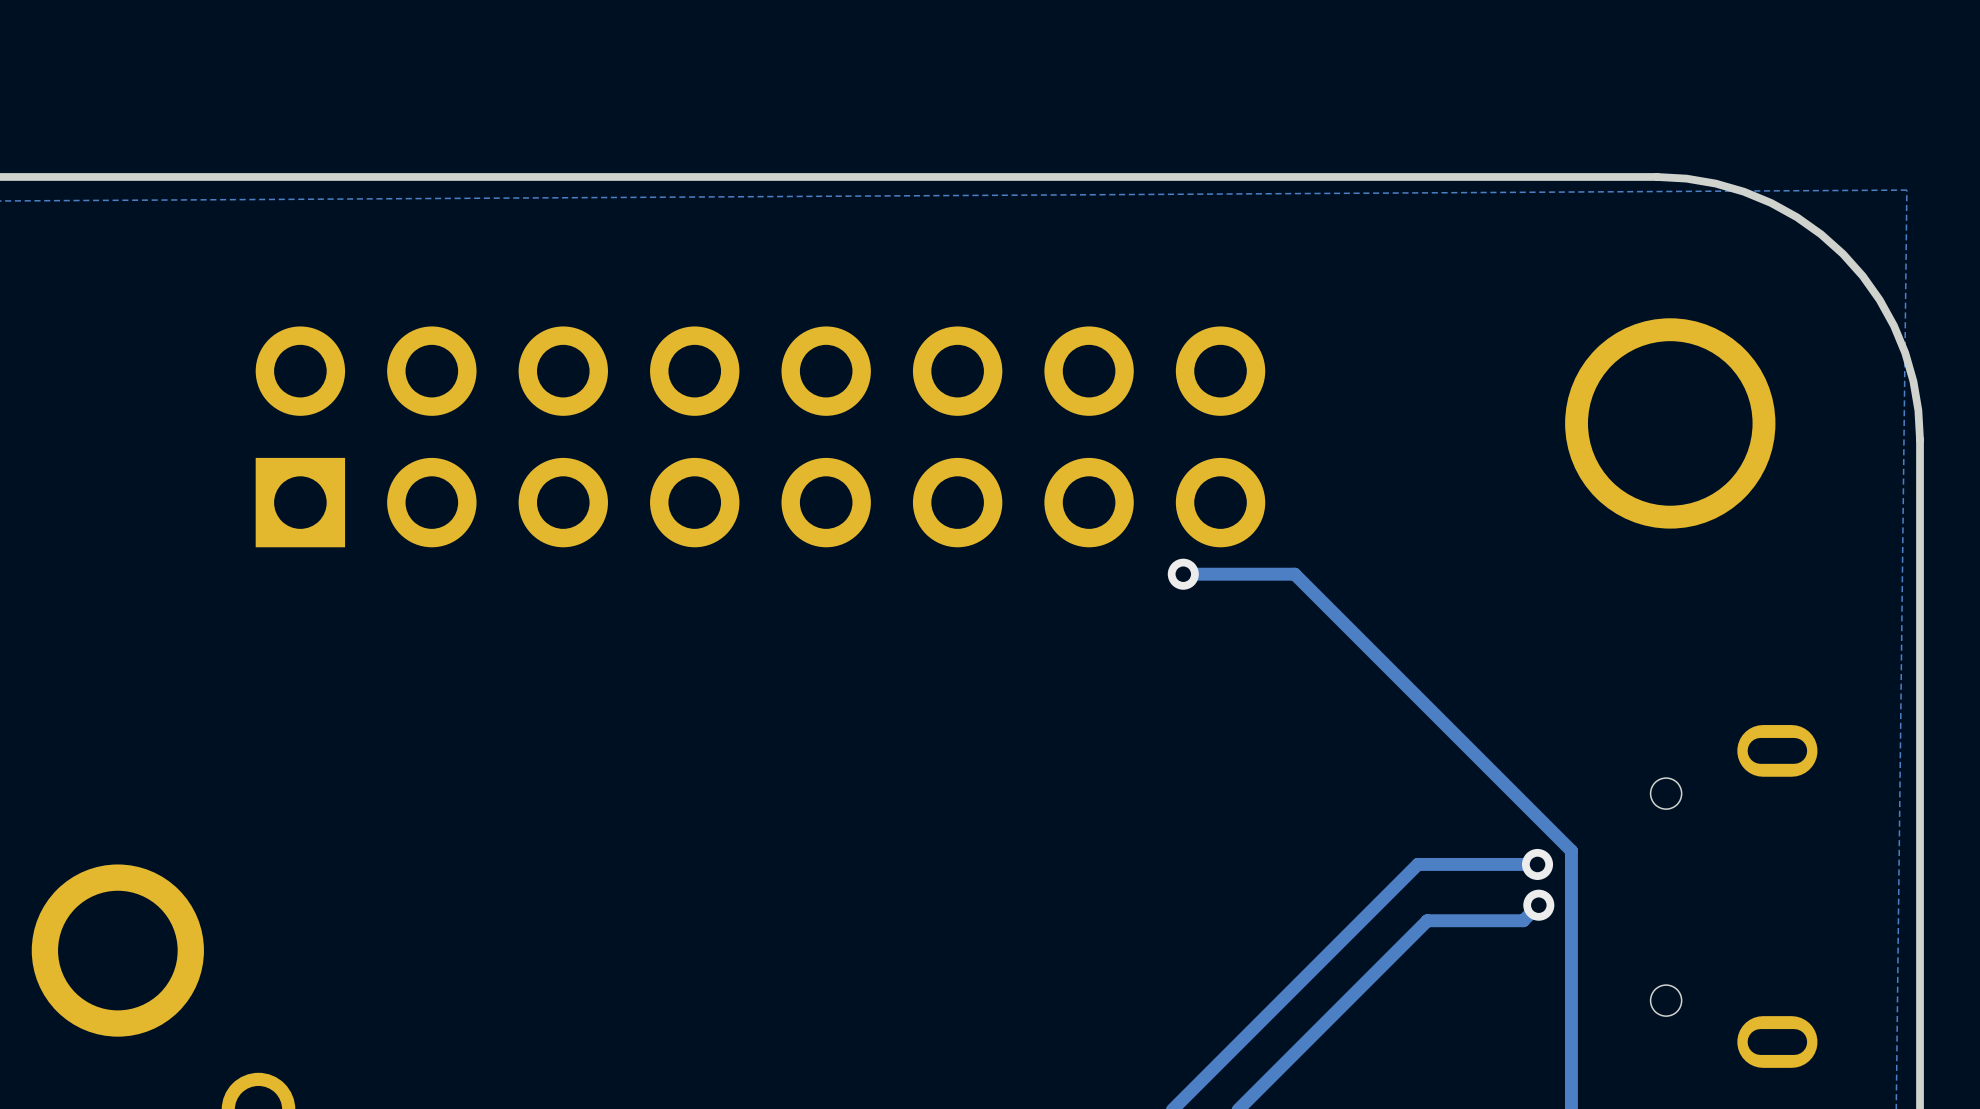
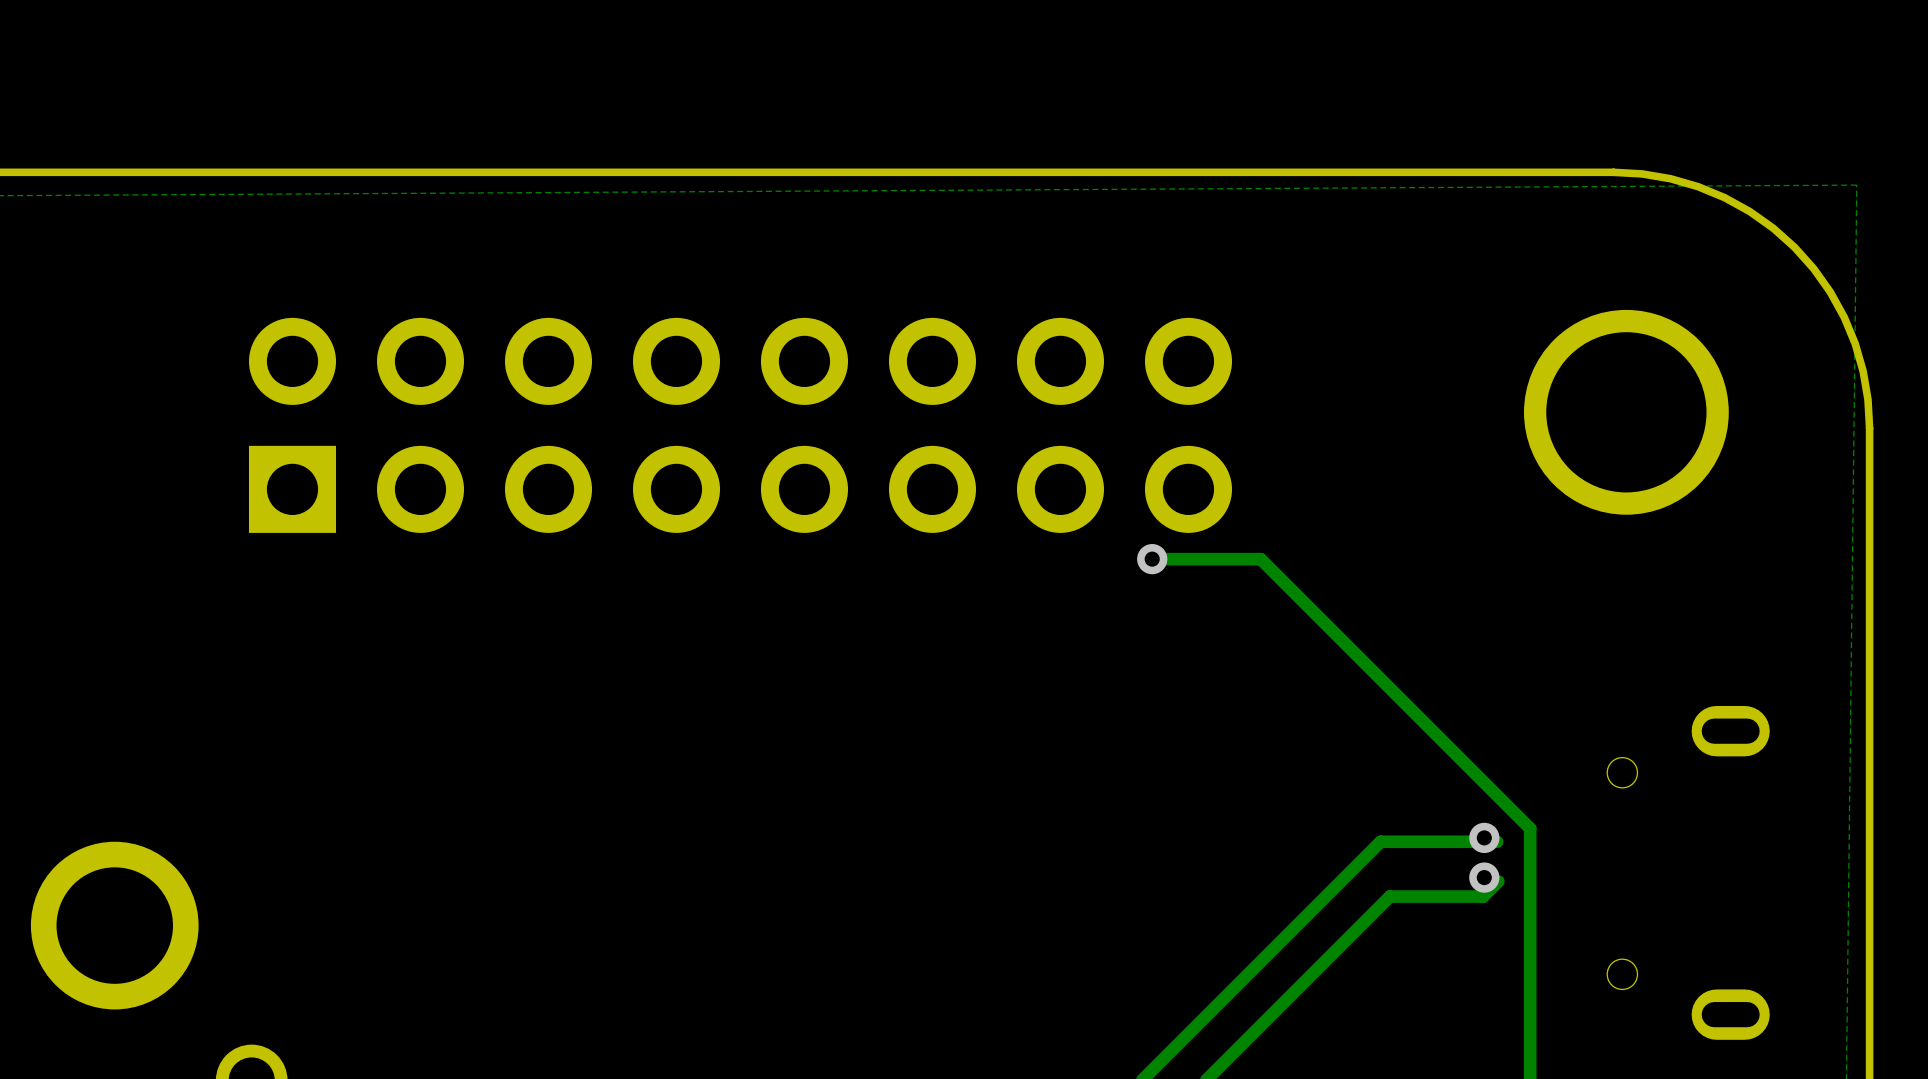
via position: (1537, 864) -> (1484, 837)
via position: (1538, 905) -> (1484, 877)

